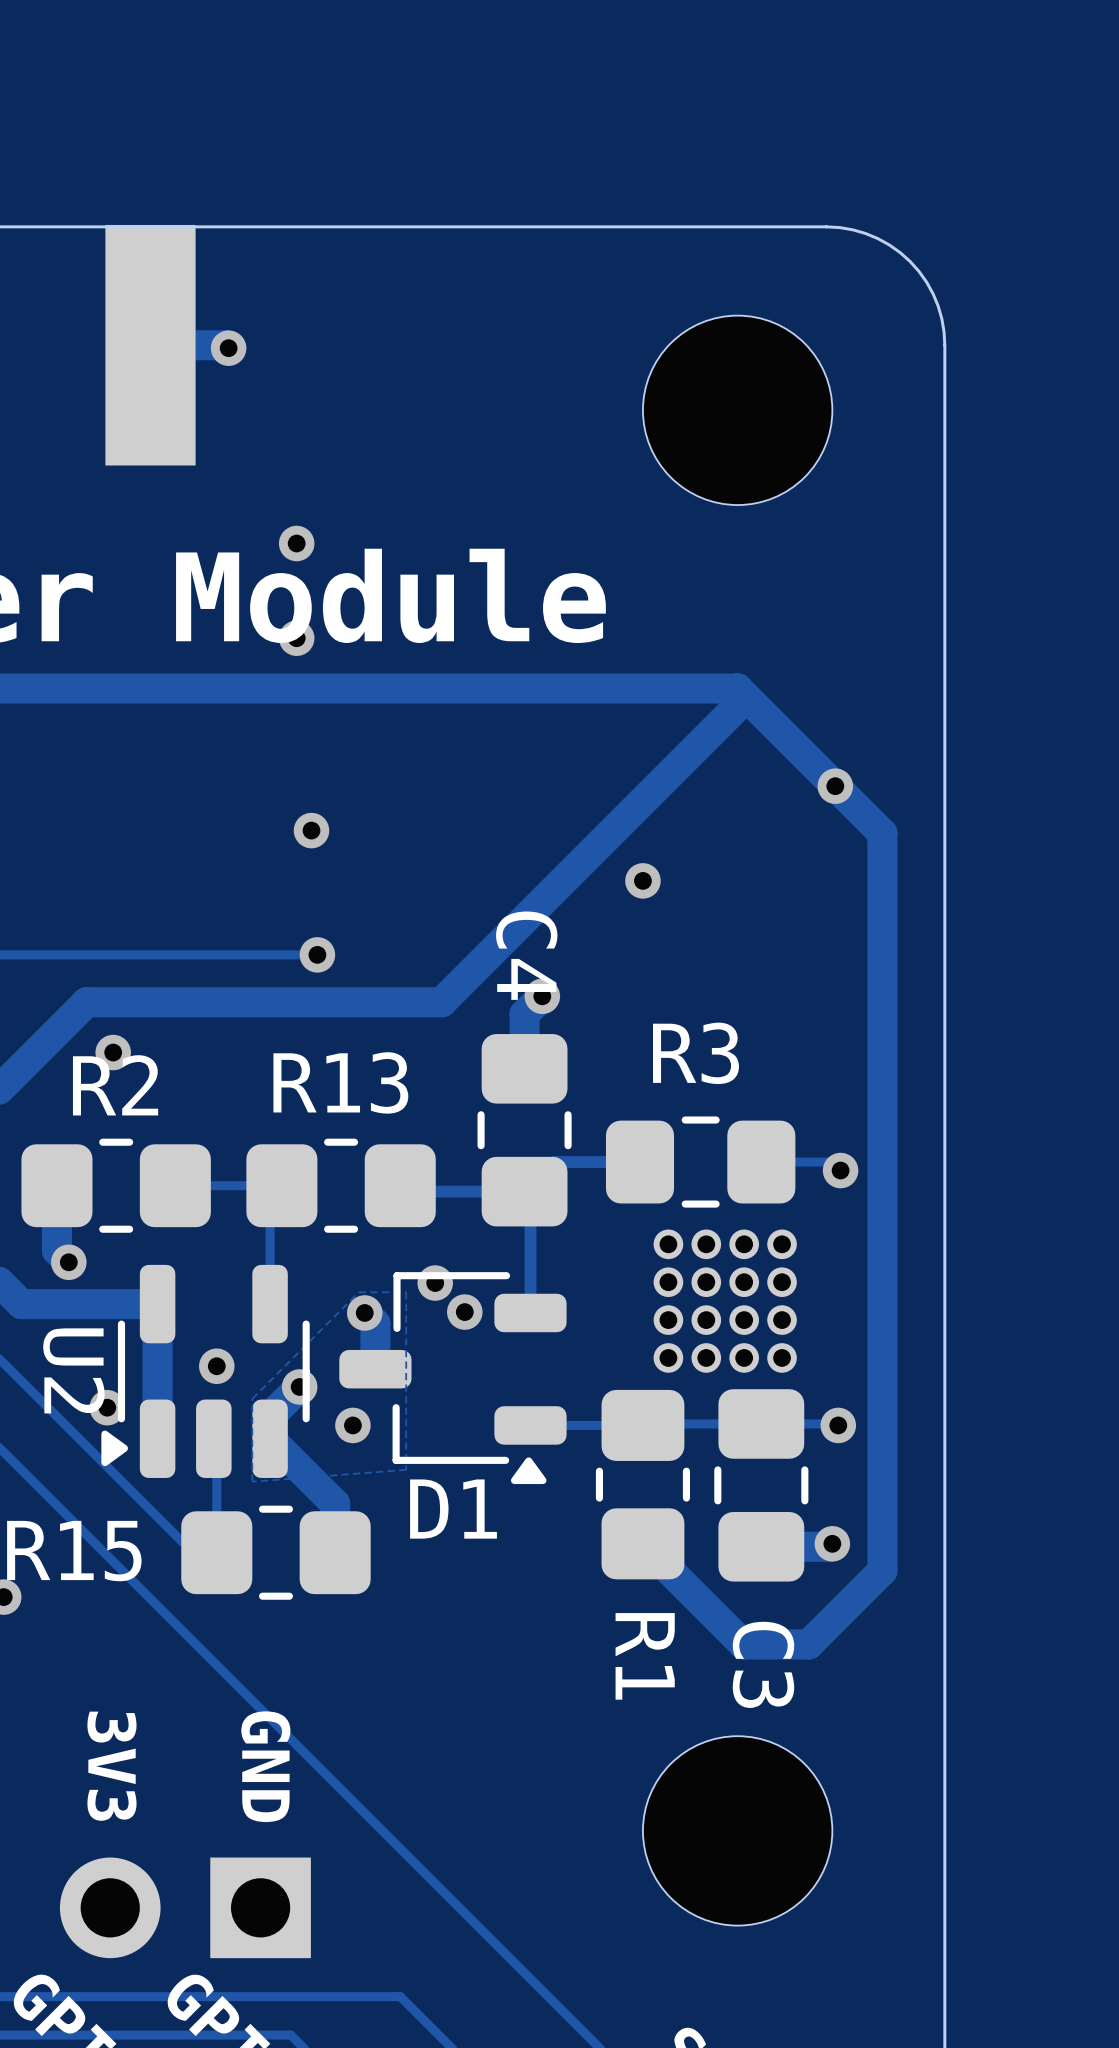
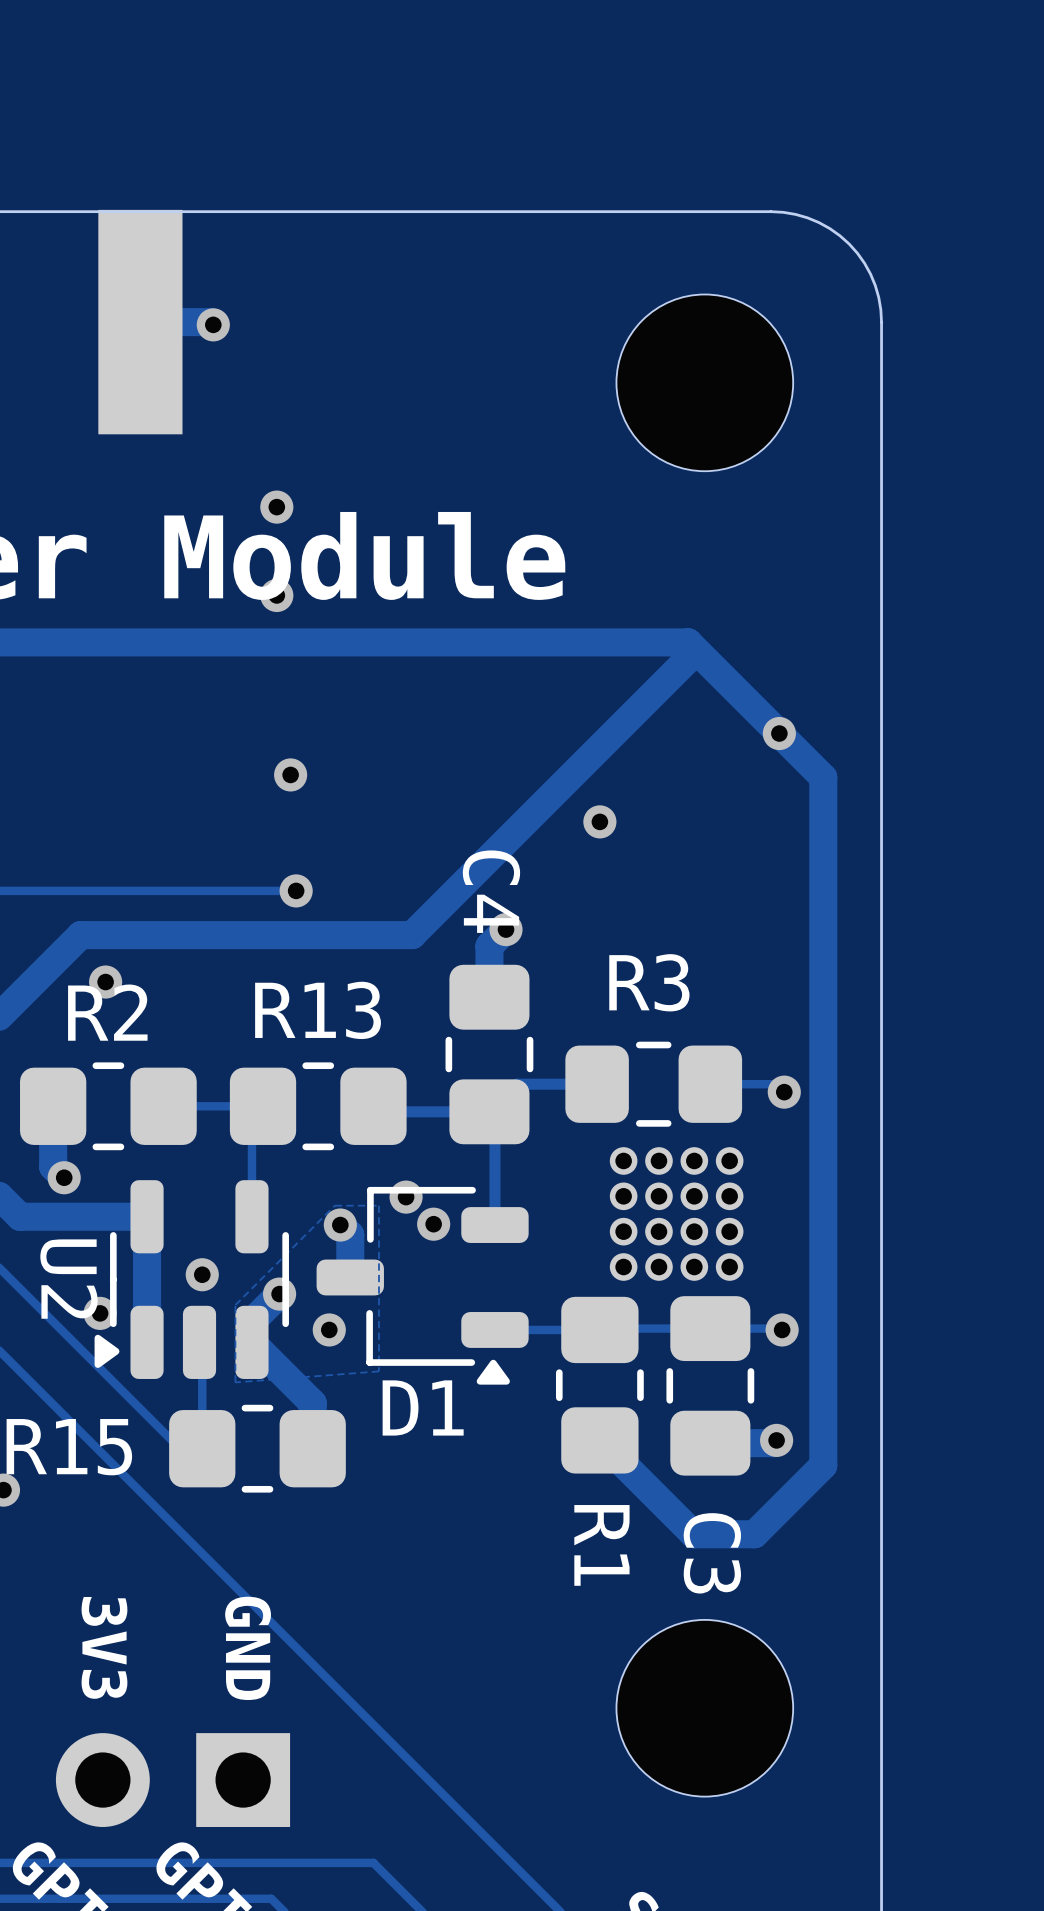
part position: (737, 410) -> (704, 382)
part position: (737, 1830) -> (704, 1708)

